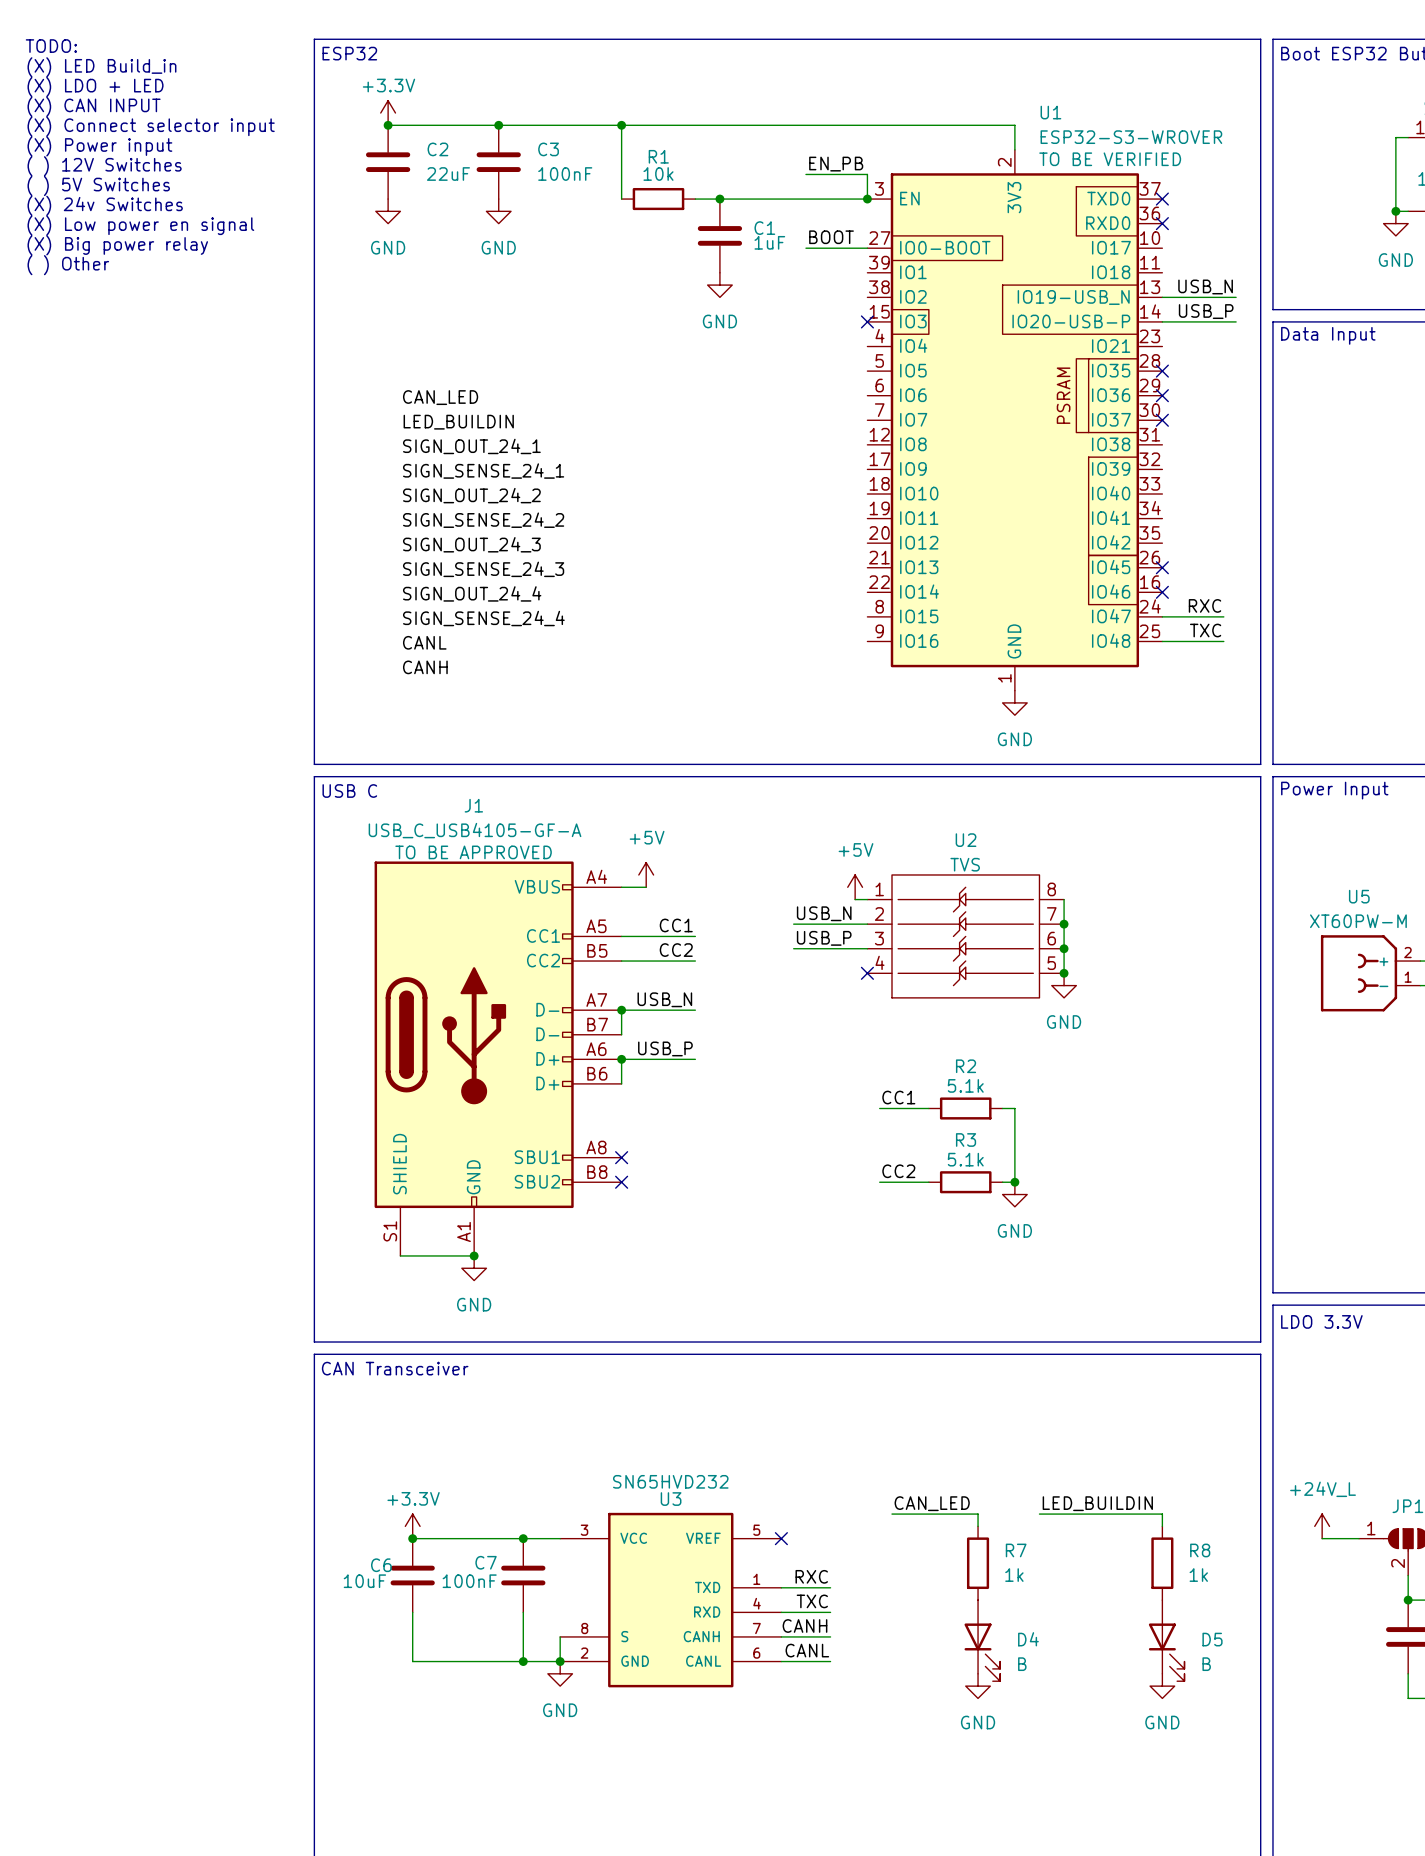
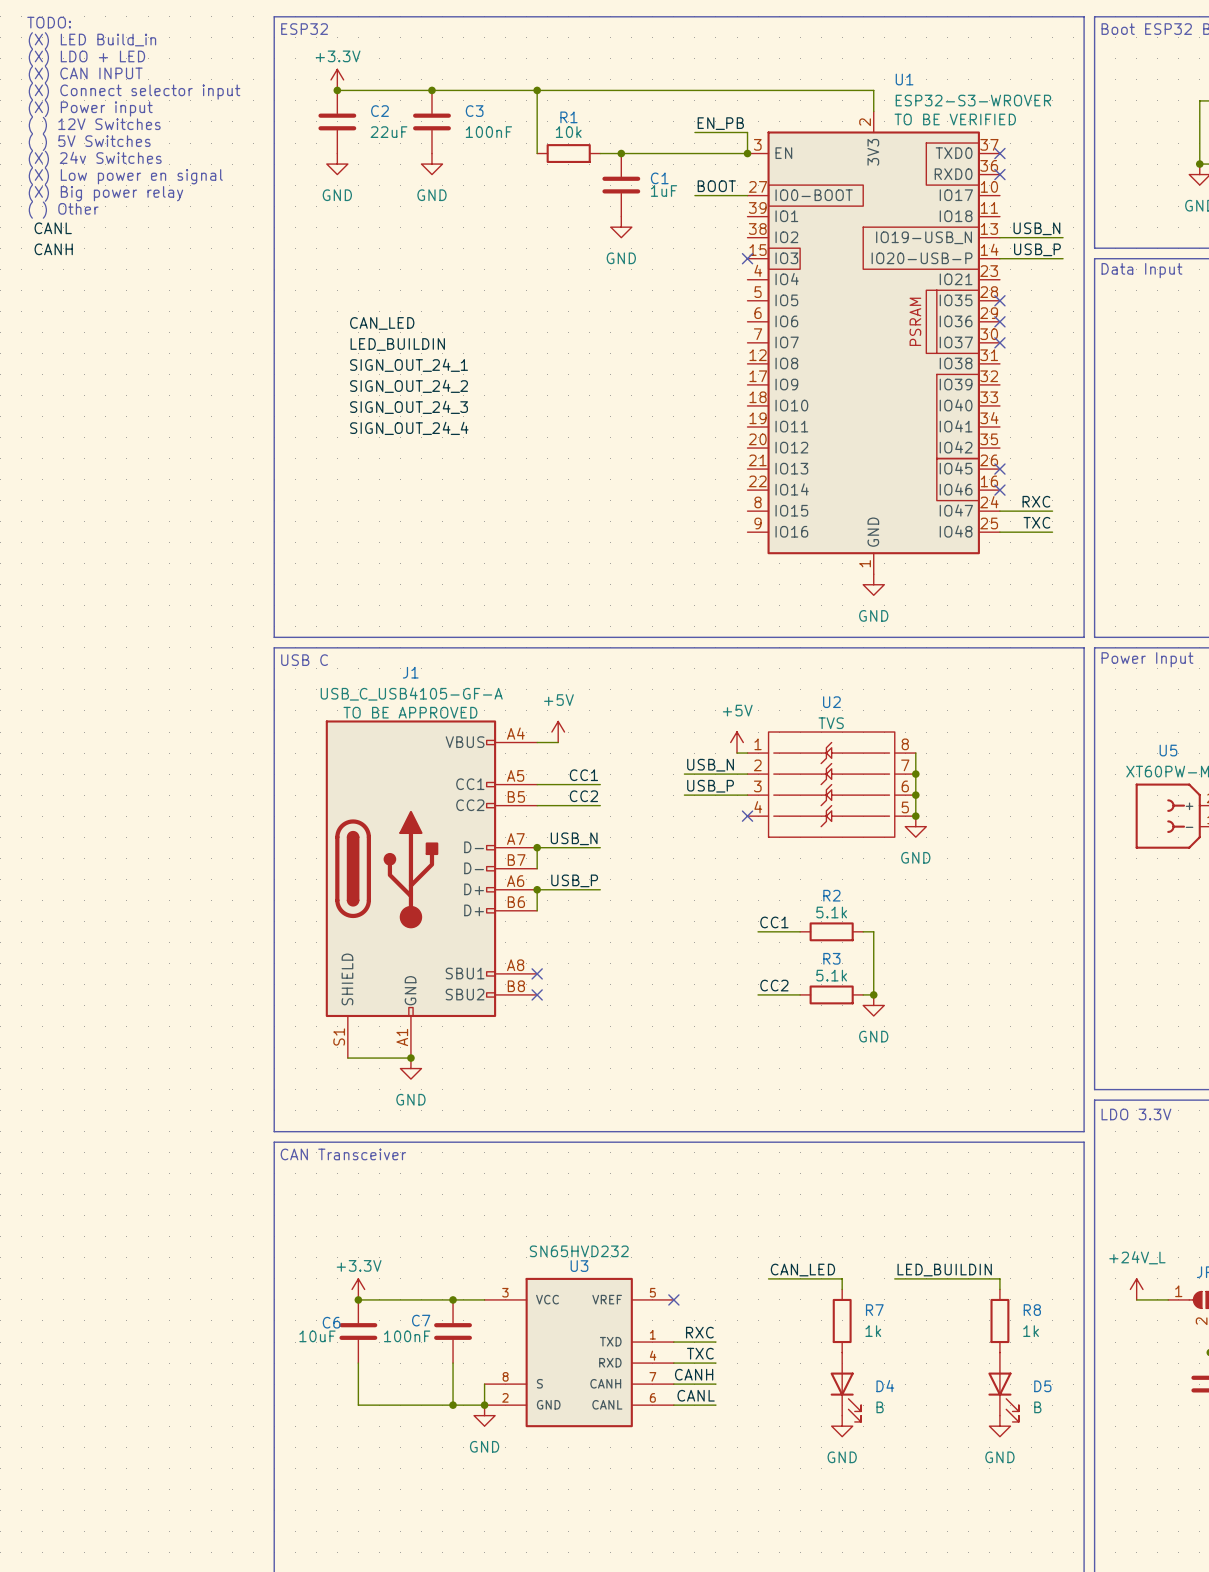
label: none -> CANL (53, 228)
label: none -> CANH (53, 249)
label: SIGN_SENSE_24_1 (483, 471) -> SIGN_OUT_24_2 (409, 386)
label: SIGN_OUT_24_2 (471, 495) -> SIGN_OUT_24_3 (409, 407)
label: SIGN_SENSE_24_2 (483, 520) -> SIGN_OUT_24_4 (409, 428)
label: SIGN_OUT_24_3 (471, 544) -> none
label: SIGN_SENSE_24_3 (483, 569) -> none
label: SIGN_OUT_24_4 (472, 593) -> none
label: SIGN_SENSE_24_4 (483, 618) -> none
label: CANL (424, 642) -> none
label: CANH (425, 667) -> none

